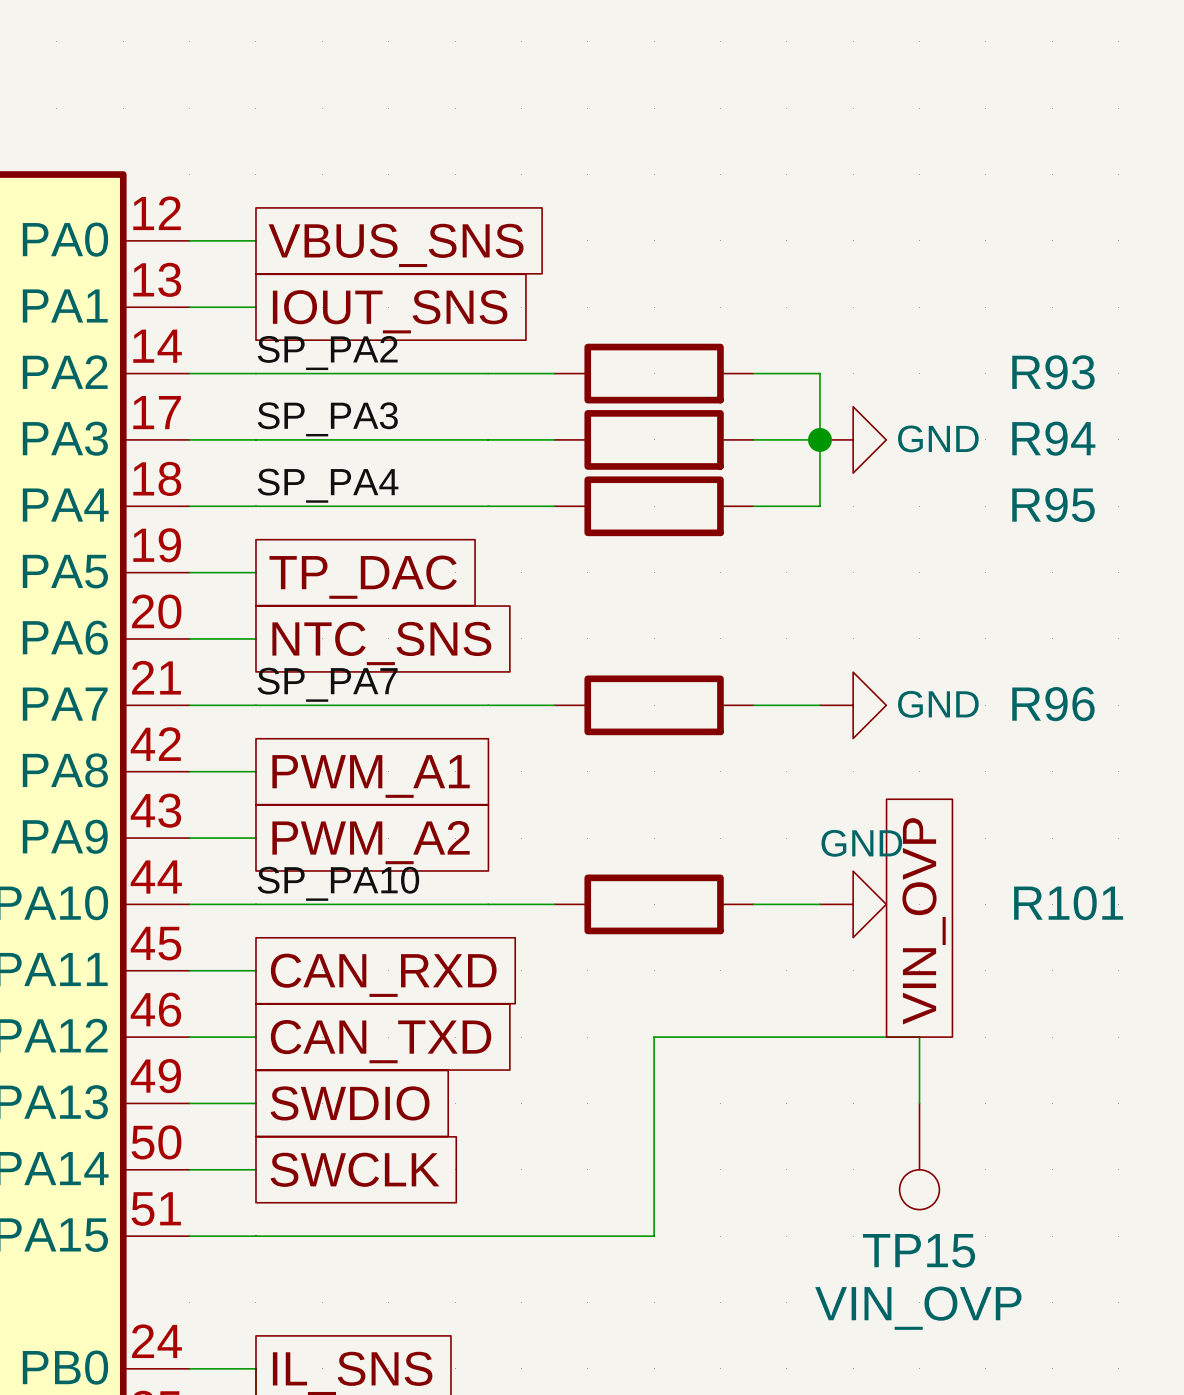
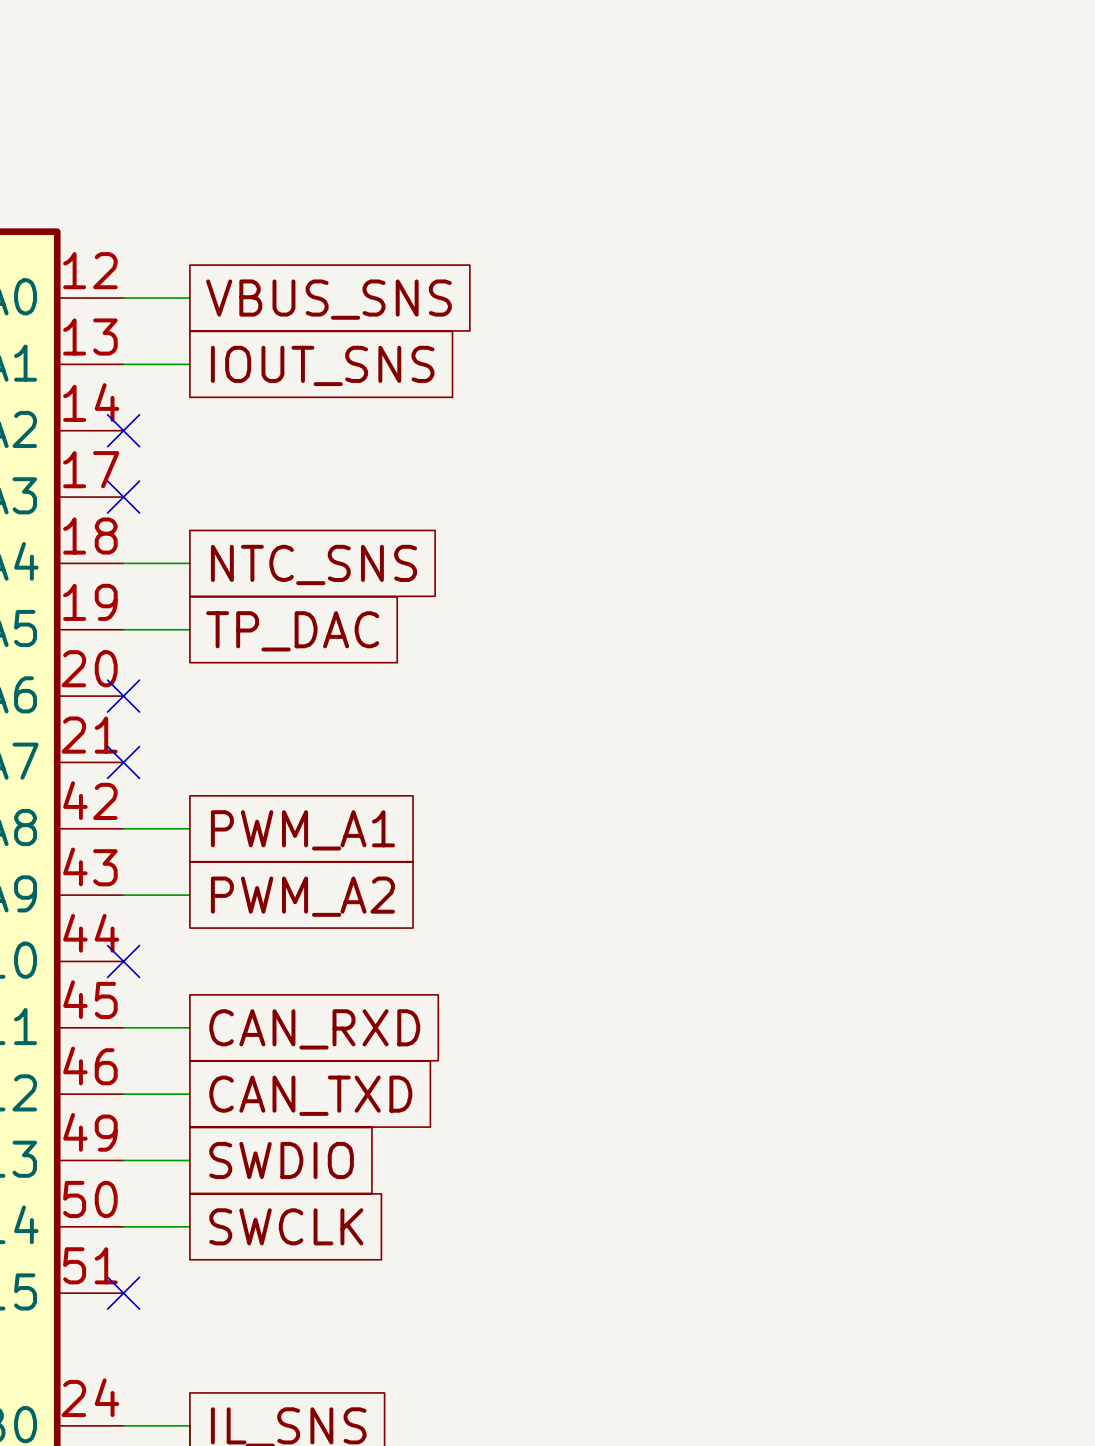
label: SP_PA2 (327, 353) -> none
wire: (189, 373) (554, 373) -> none
no-connect mark: none -> (123, 430)
R93: (654, 373) -> none
wire: (753, 373) (819, 373) (819, 506) (753, 506) -> none
label: SP_PA3 (327, 419) -> none
wire: (189, 439) (554, 439) -> none
no-connect mark: none -> (123, 497)
R94: (654, 439) -> none
wire: (753, 439) (819, 439) -> none
junction: (819, 439) -> none
power symbol: GND (853, 439) -> none
label: SP_PA4 (328, 485) -> none
wire: (255, 506) (554, 506) -> none
R95: (654, 506) -> none
wire: (189, 638) (255, 638) -> none
no-connect mark: none -> (123, 696)
global label position: NTC_SNS (381, 643) -> NTC_SNS (313, 564)
label: SP_PA7 (327, 684) -> none
wire: (189, 705) (554, 705) -> none
no-connect mark: none -> (123, 762)
R96: (654, 705) -> none
wire: (753, 705) (819, 705) -> none
power symbol: GND (853, 705) -> none
label: SP_PA10 (338, 883) -> none
wire: (189, 904) (554, 904) -> none
no-connect mark: none -> (123, 961)
R101: (654, 904) -> none
wire: (753, 904) (819, 904) -> none
power symbol: GND (853, 904) -> none
global label: VIN_OVP (924, 921) -> none
wire: (919, 1103) (919, 1037) (654, 1037) (654, 1236) (189, 1236) -> none
TP15: VIN_OVP (919, 1156) -> none
no-connect mark: none -> (123, 1293)

